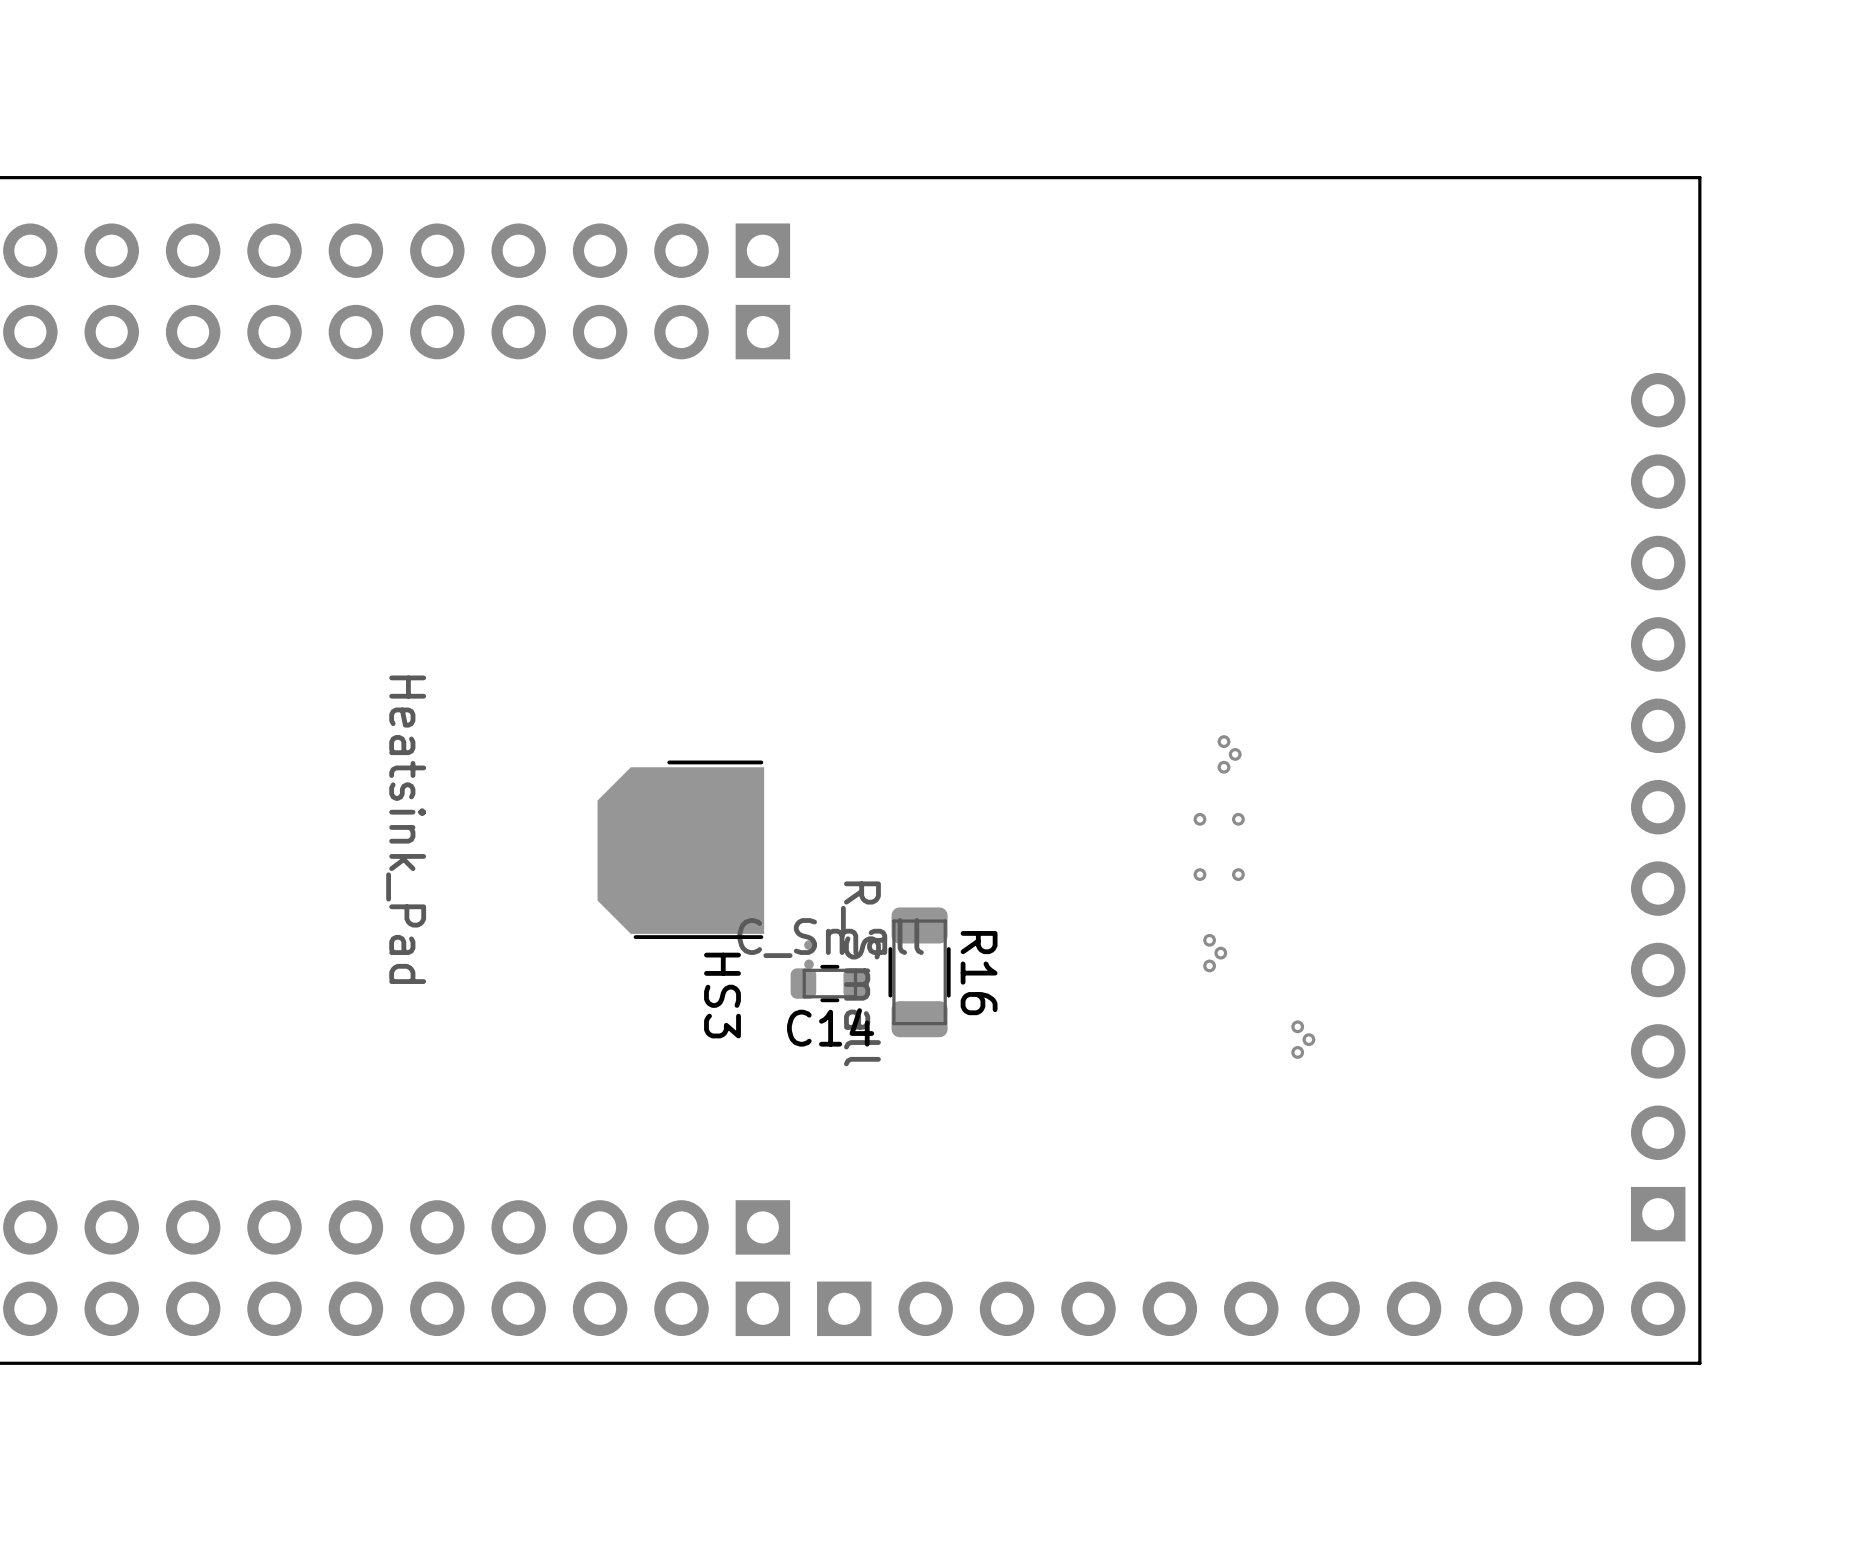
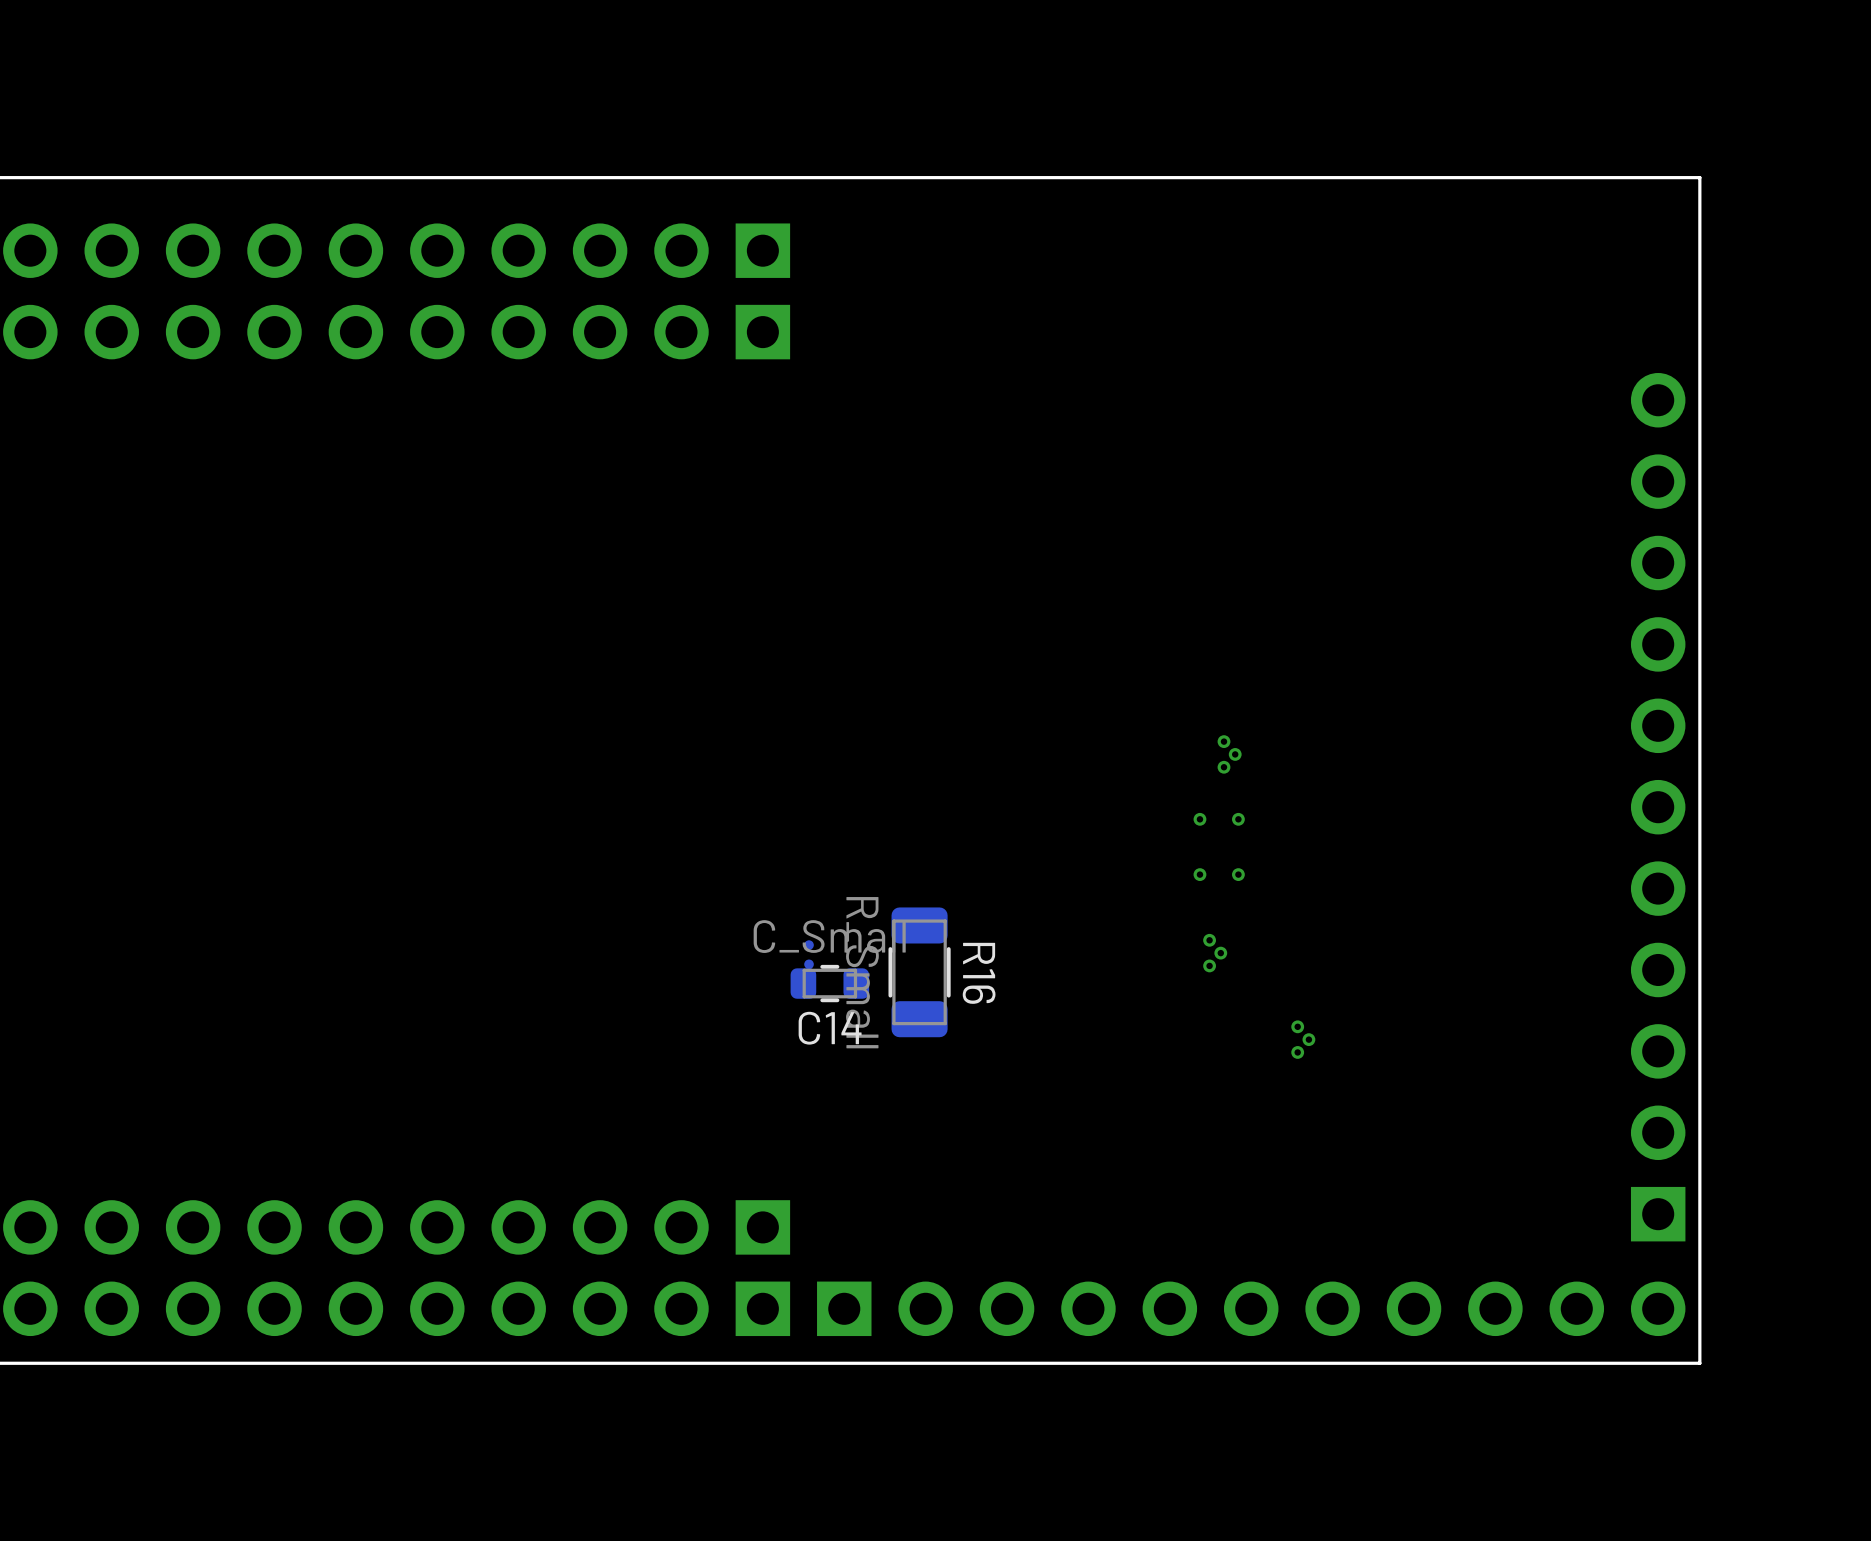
HS3: Heatsink_Pad (680, 849) -> none

